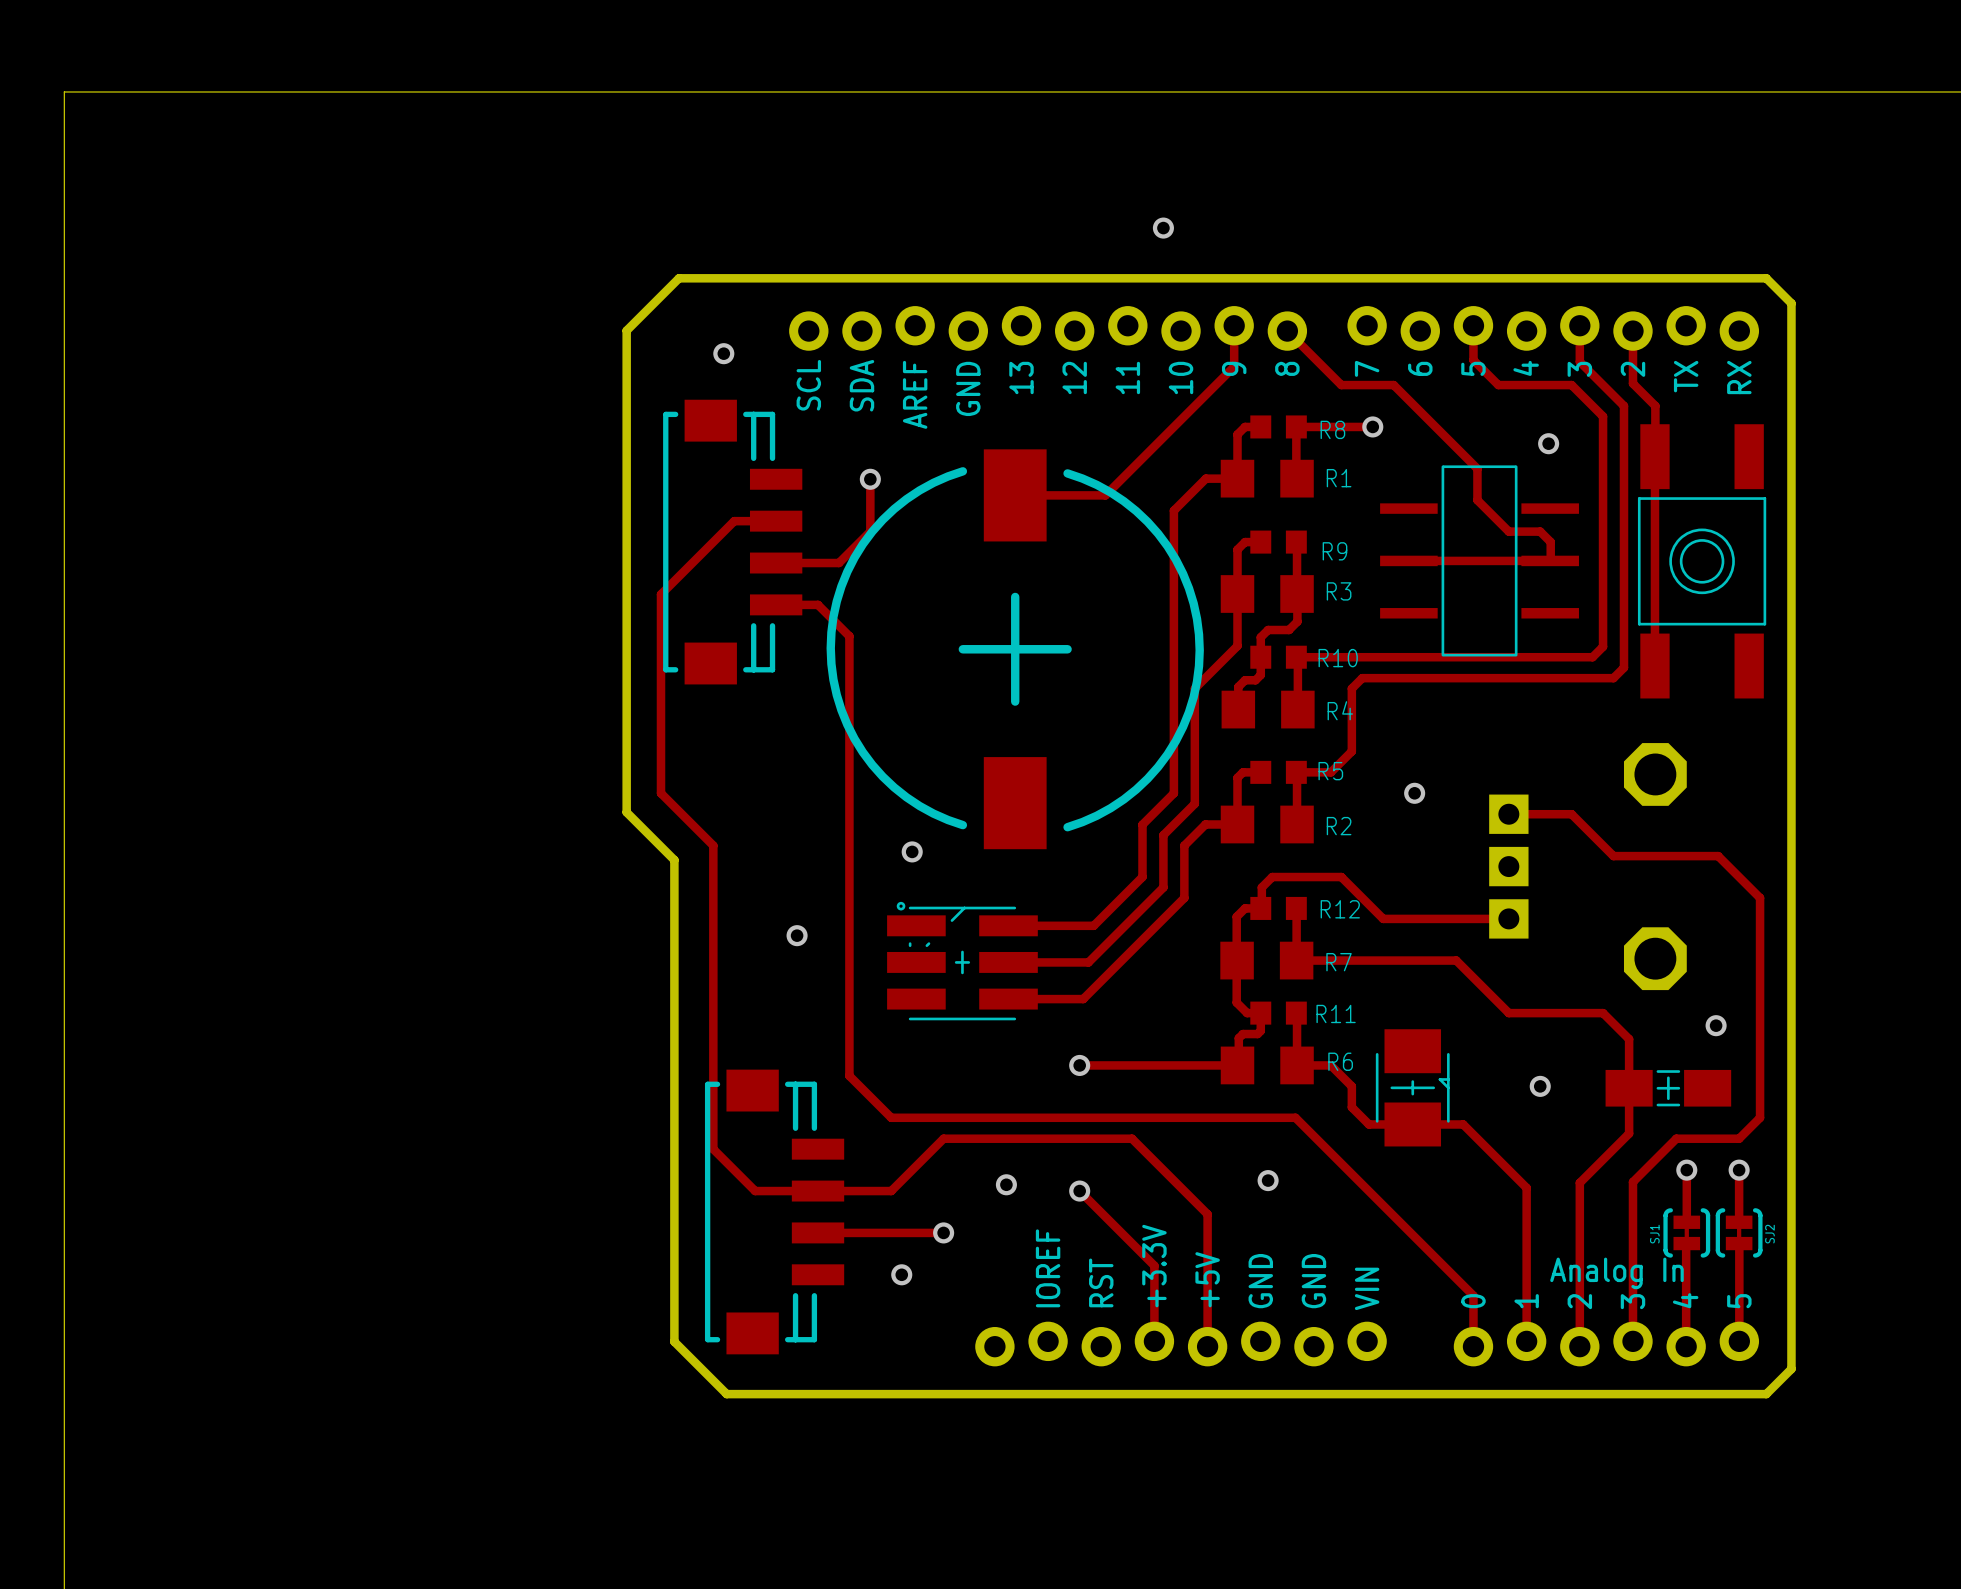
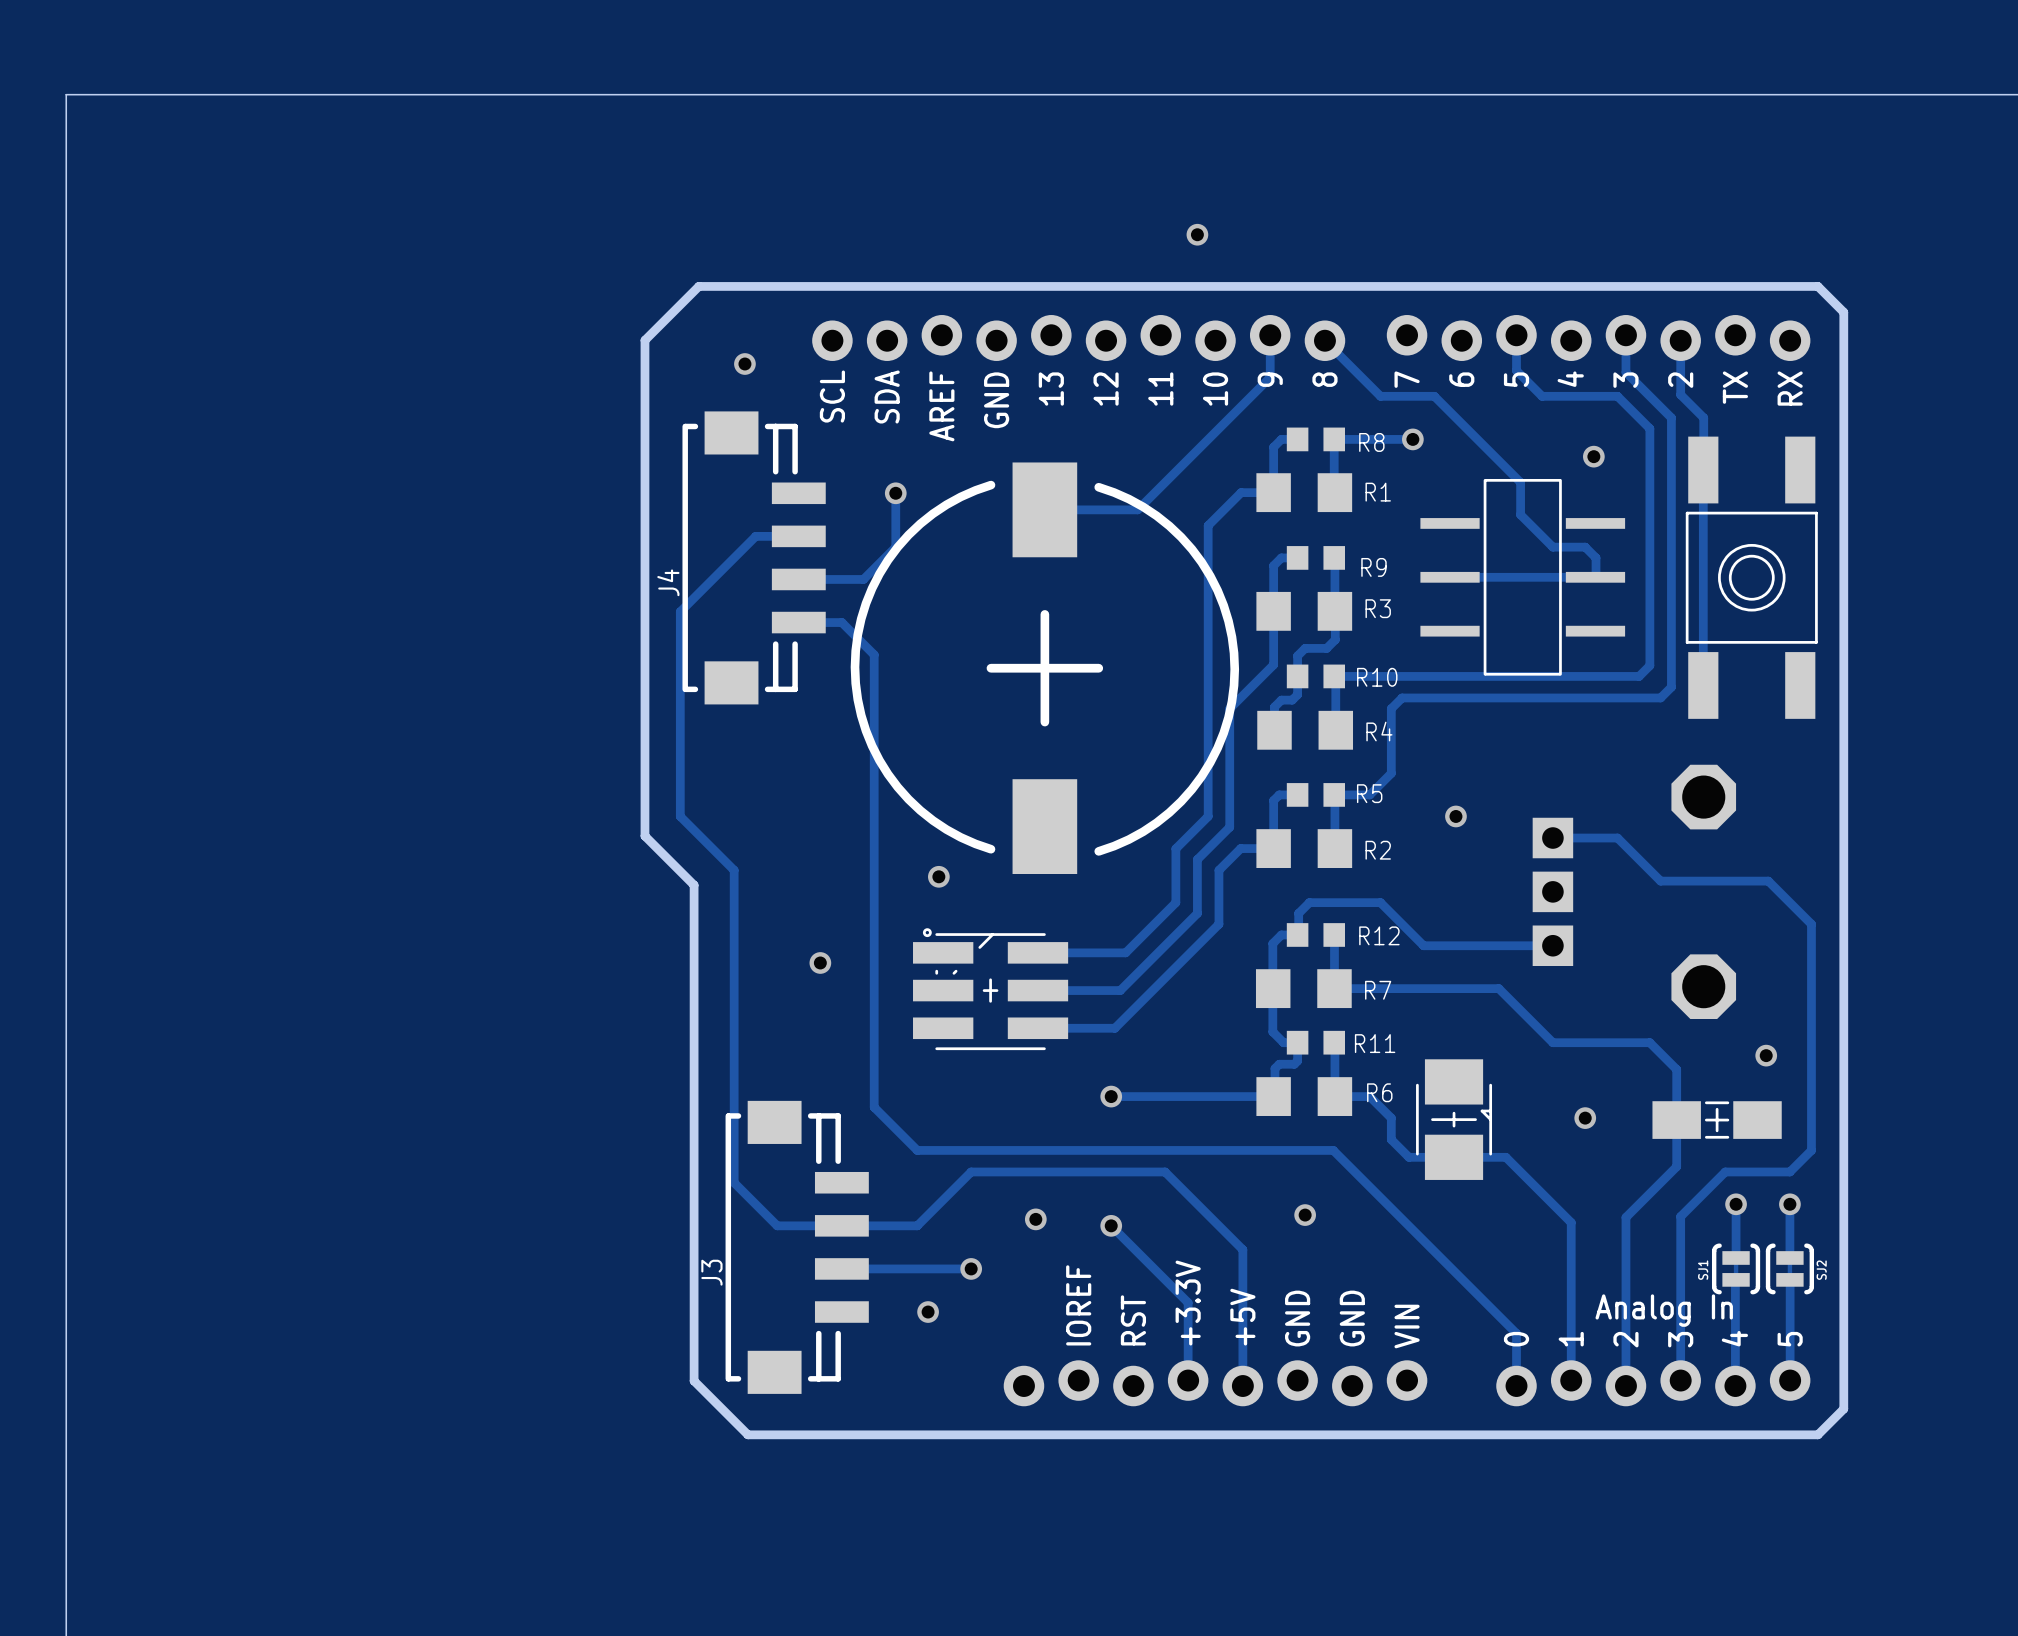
J4 name: none -> J4 (668, 582)
J3 name: none -> J3 (711, 1272)

